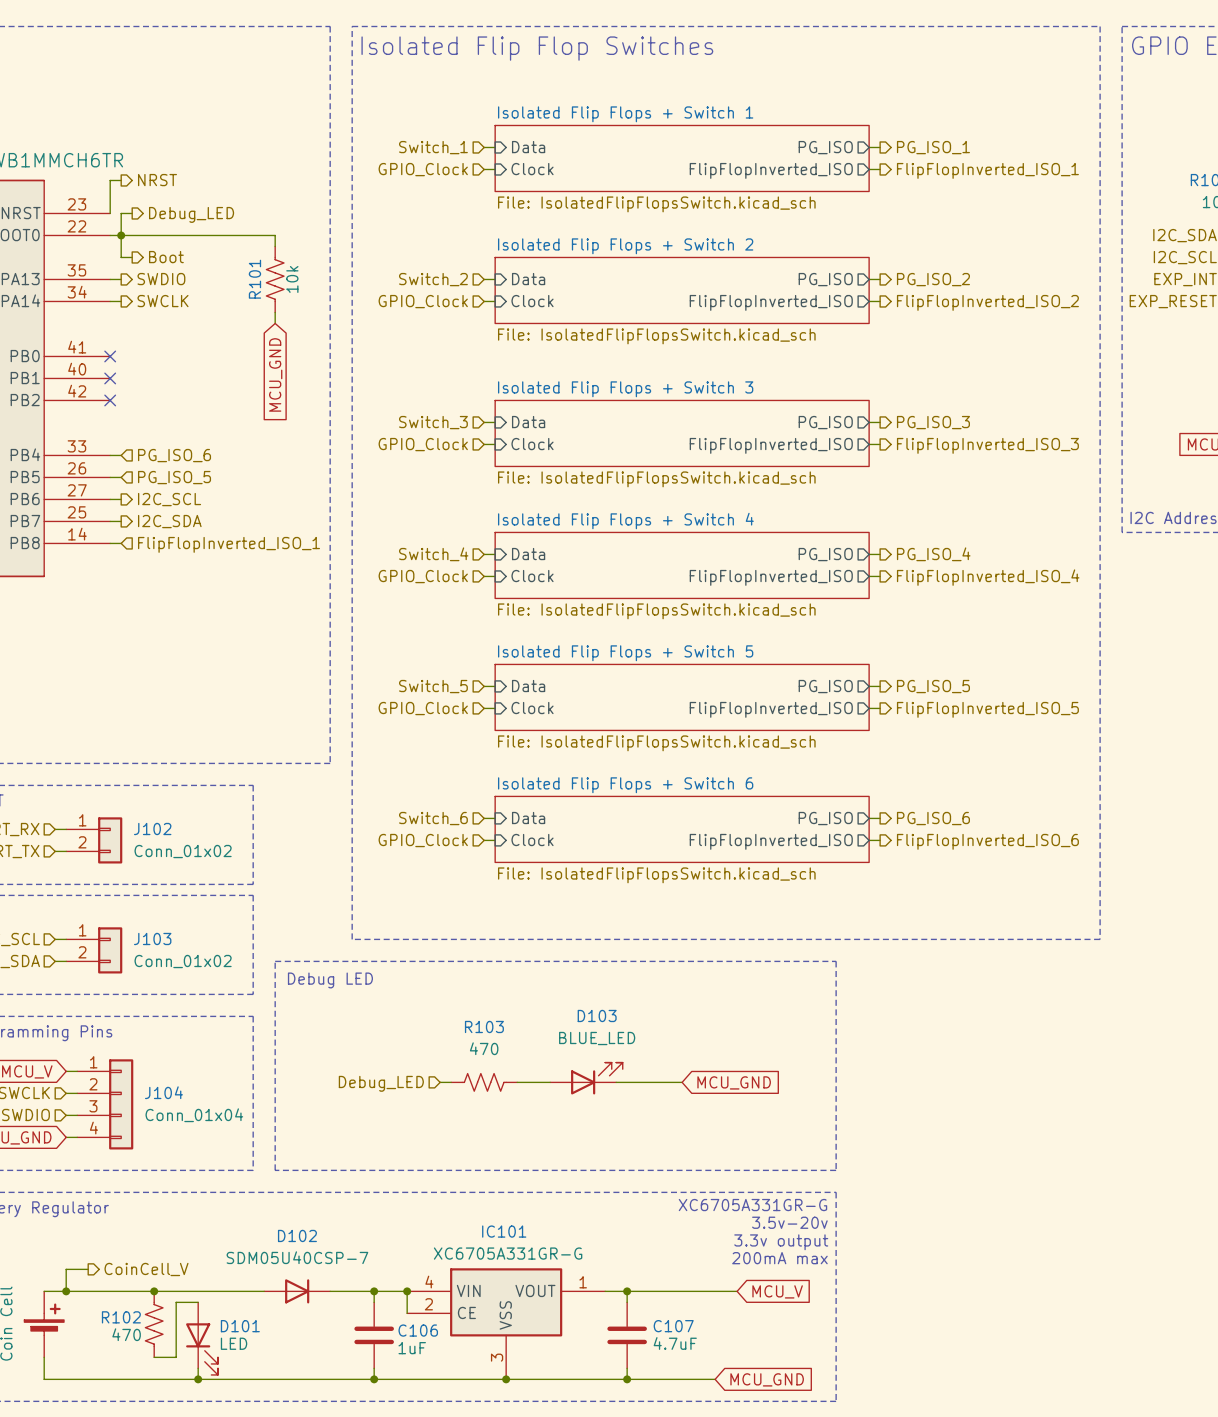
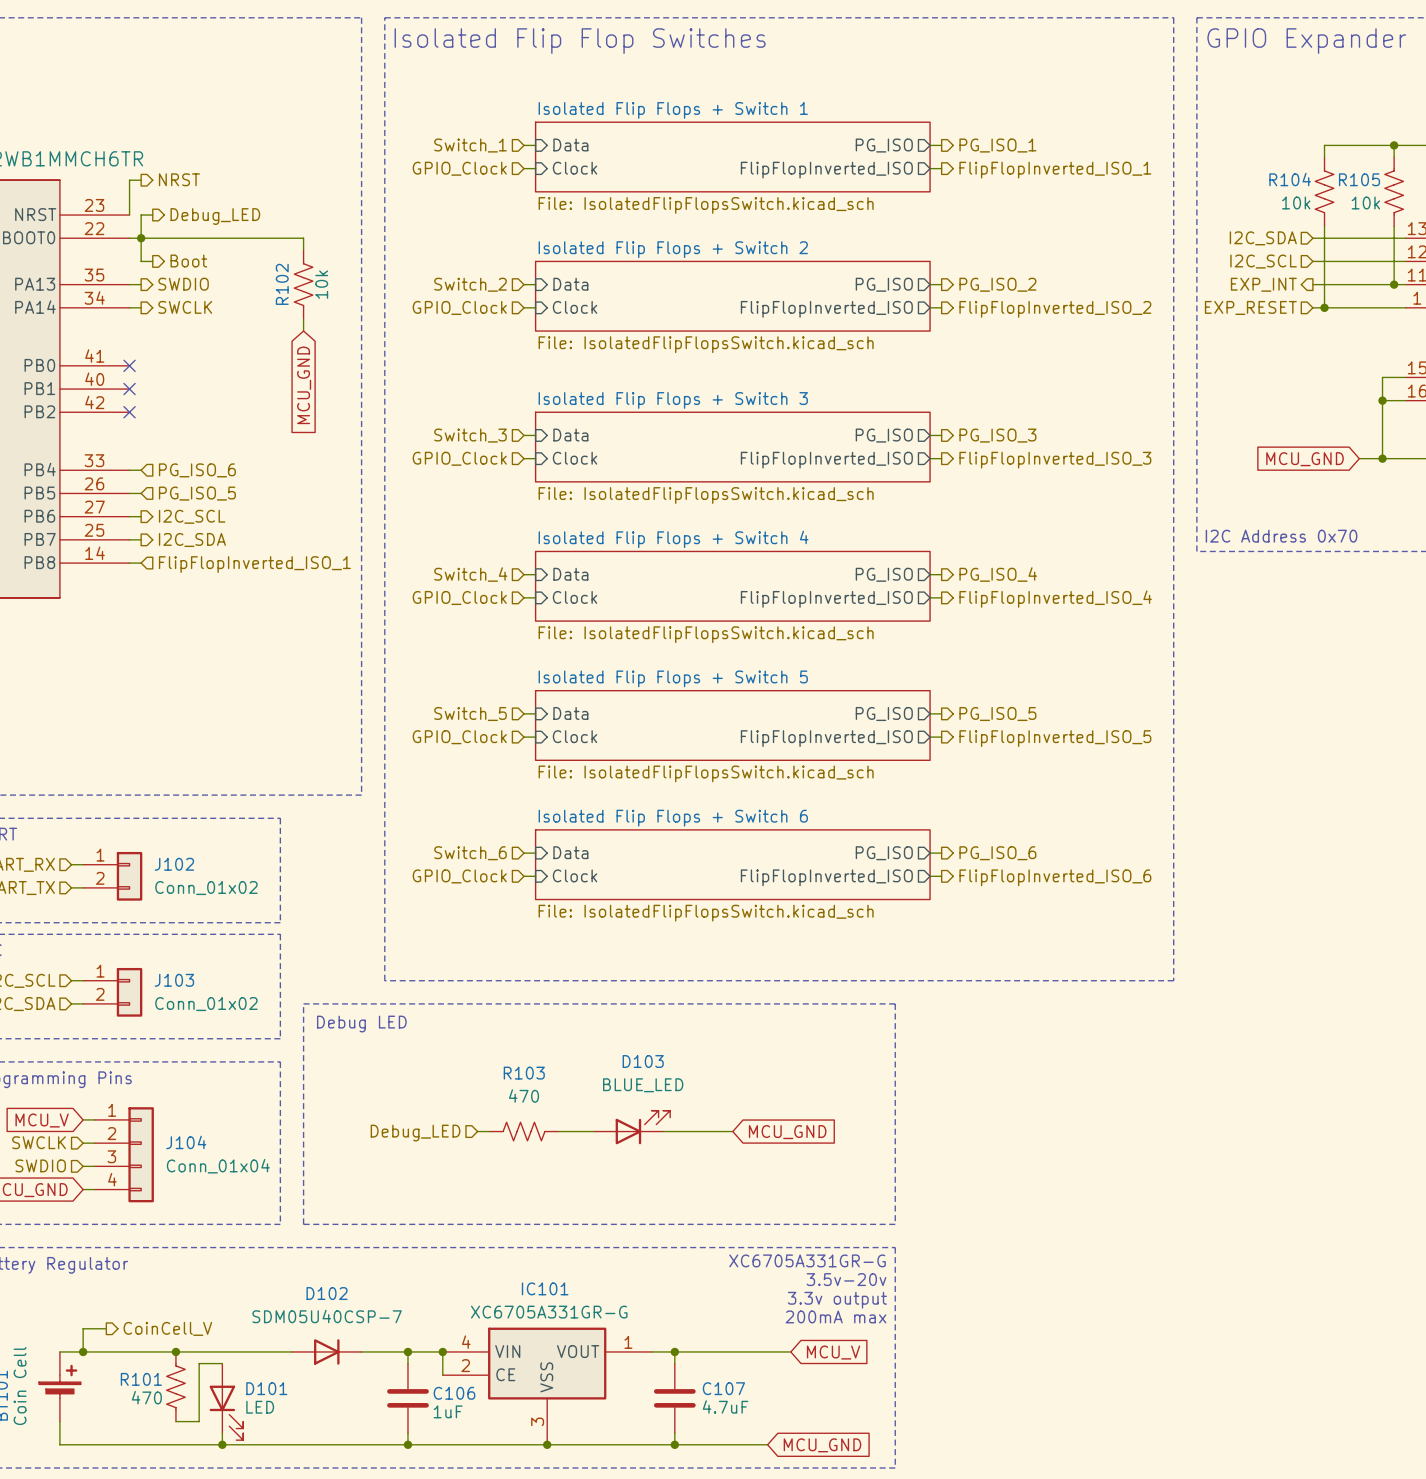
R101 name: R101 (254, 279) -> R102 (282, 284)
R102 name: R102 (121, 1317) -> R101 (141, 1379)

